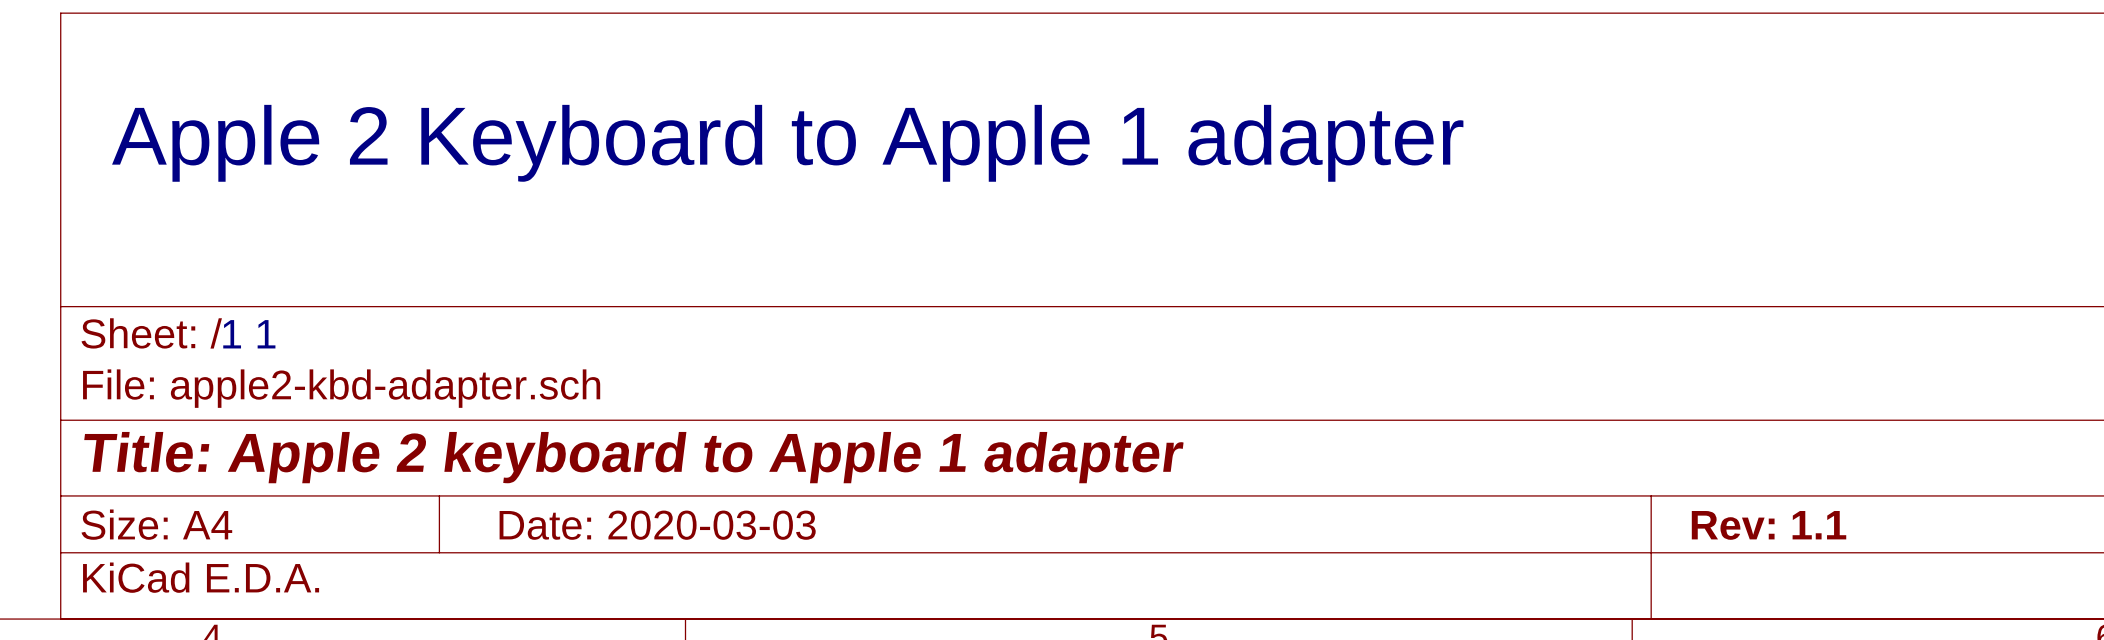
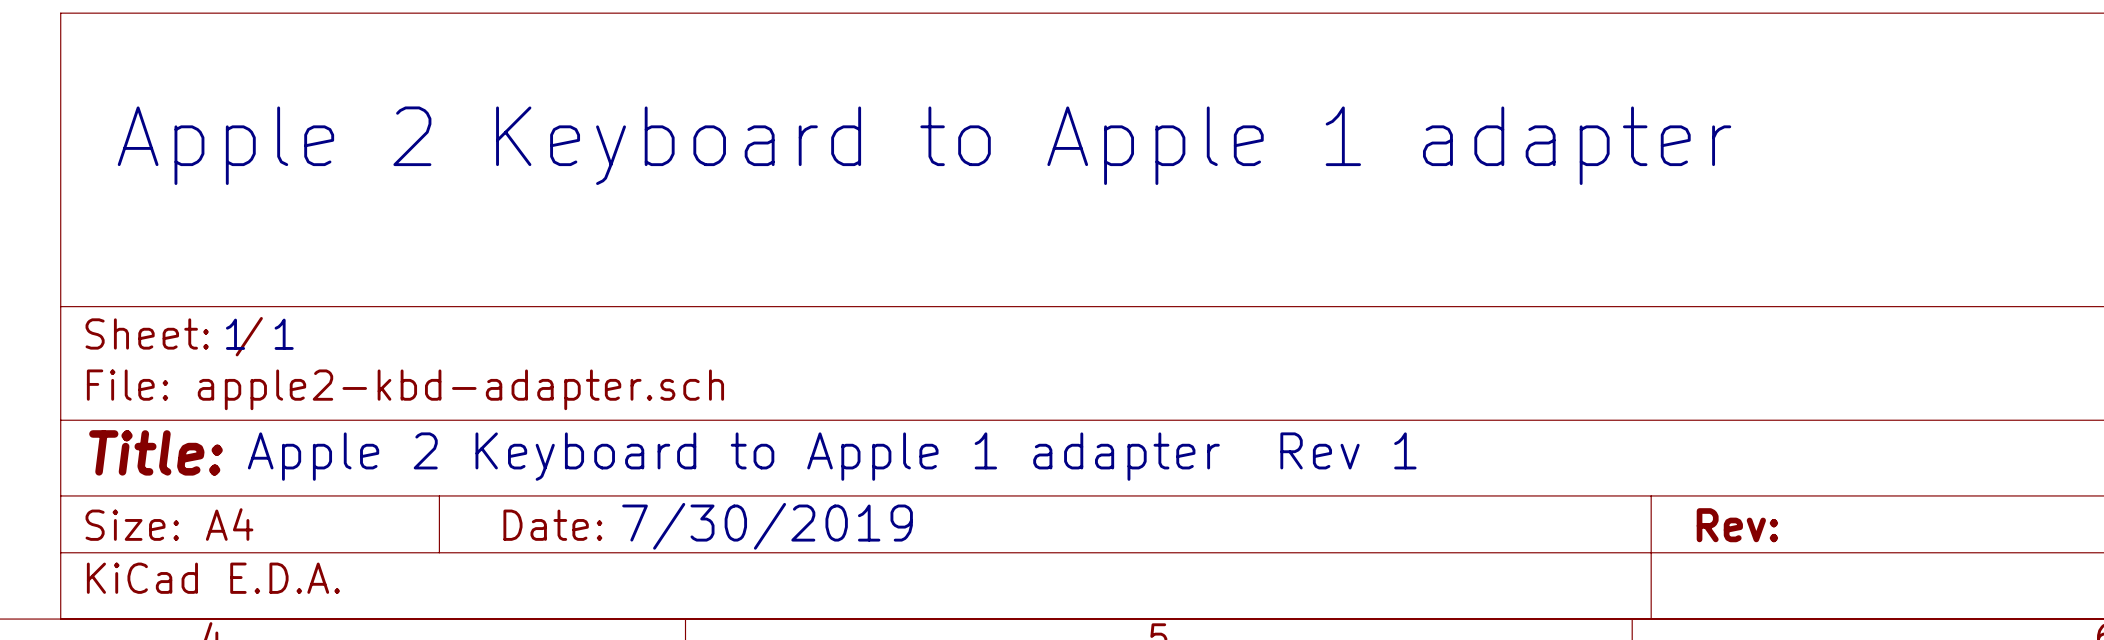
text: none -> Apple 2 Keyboard to Apple 1 adapter Rev 1 (832, 456)
title block: Title: Apple 2 keyboard to Apple 1 adapter (633, 457) -> Title: (155, 452)
text: none -> 7/30/2019 (767, 526)
title block: Date: 2020-03-03 (657, 525) -> Date: (552, 525)
title block: Rev: 1.1 (1769, 525) -> Rev: (1737, 525)

